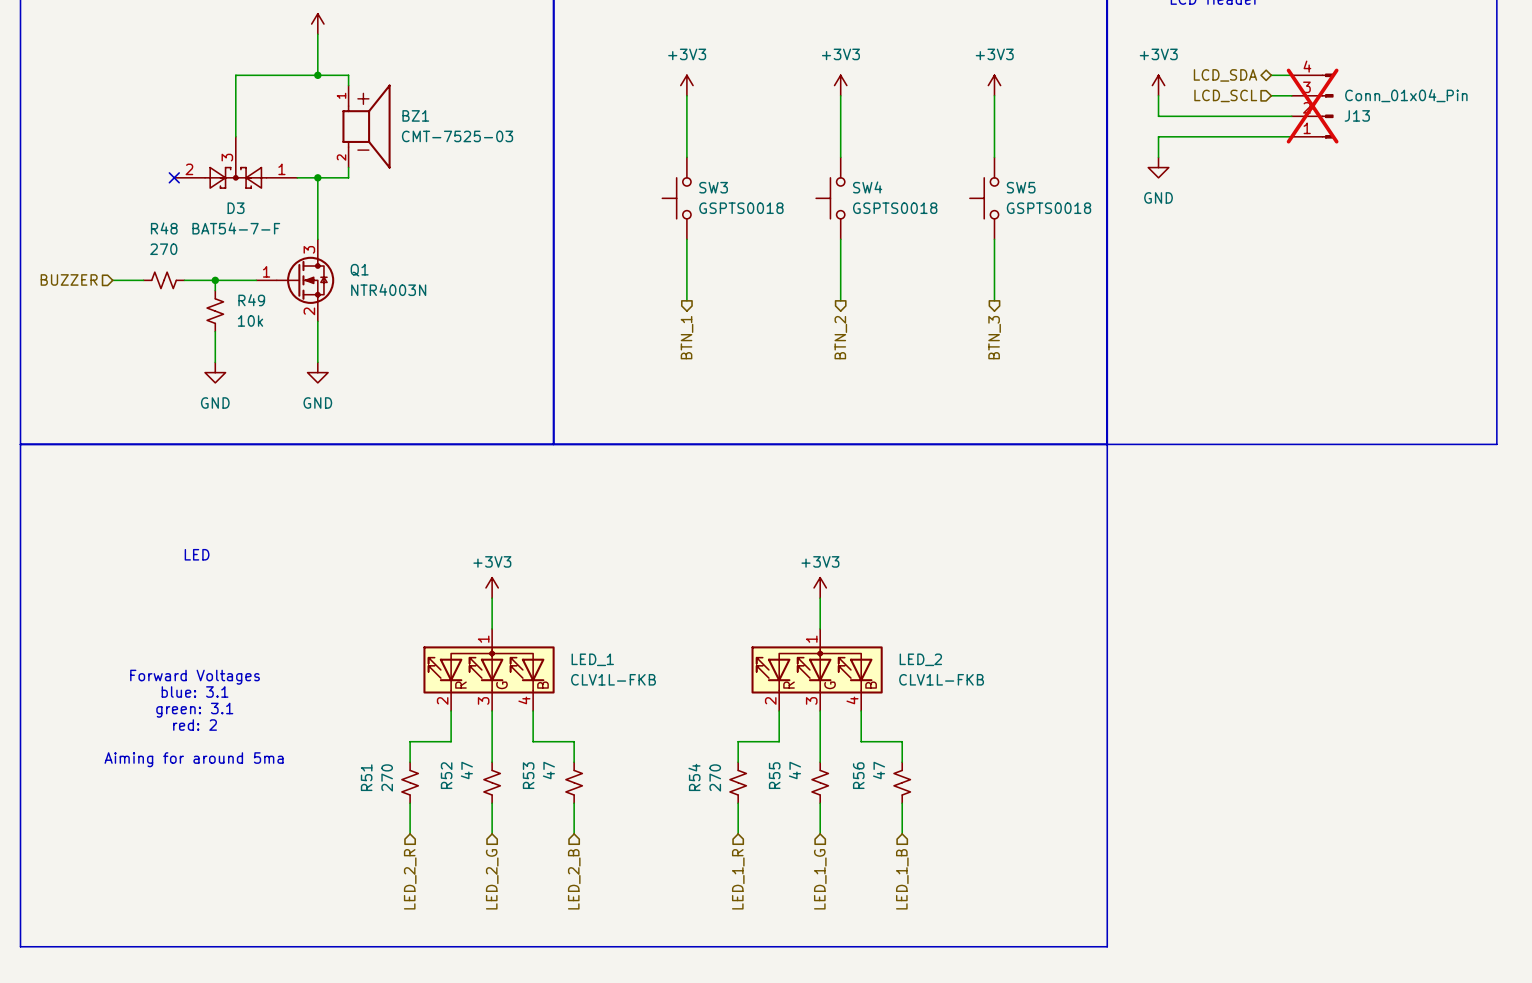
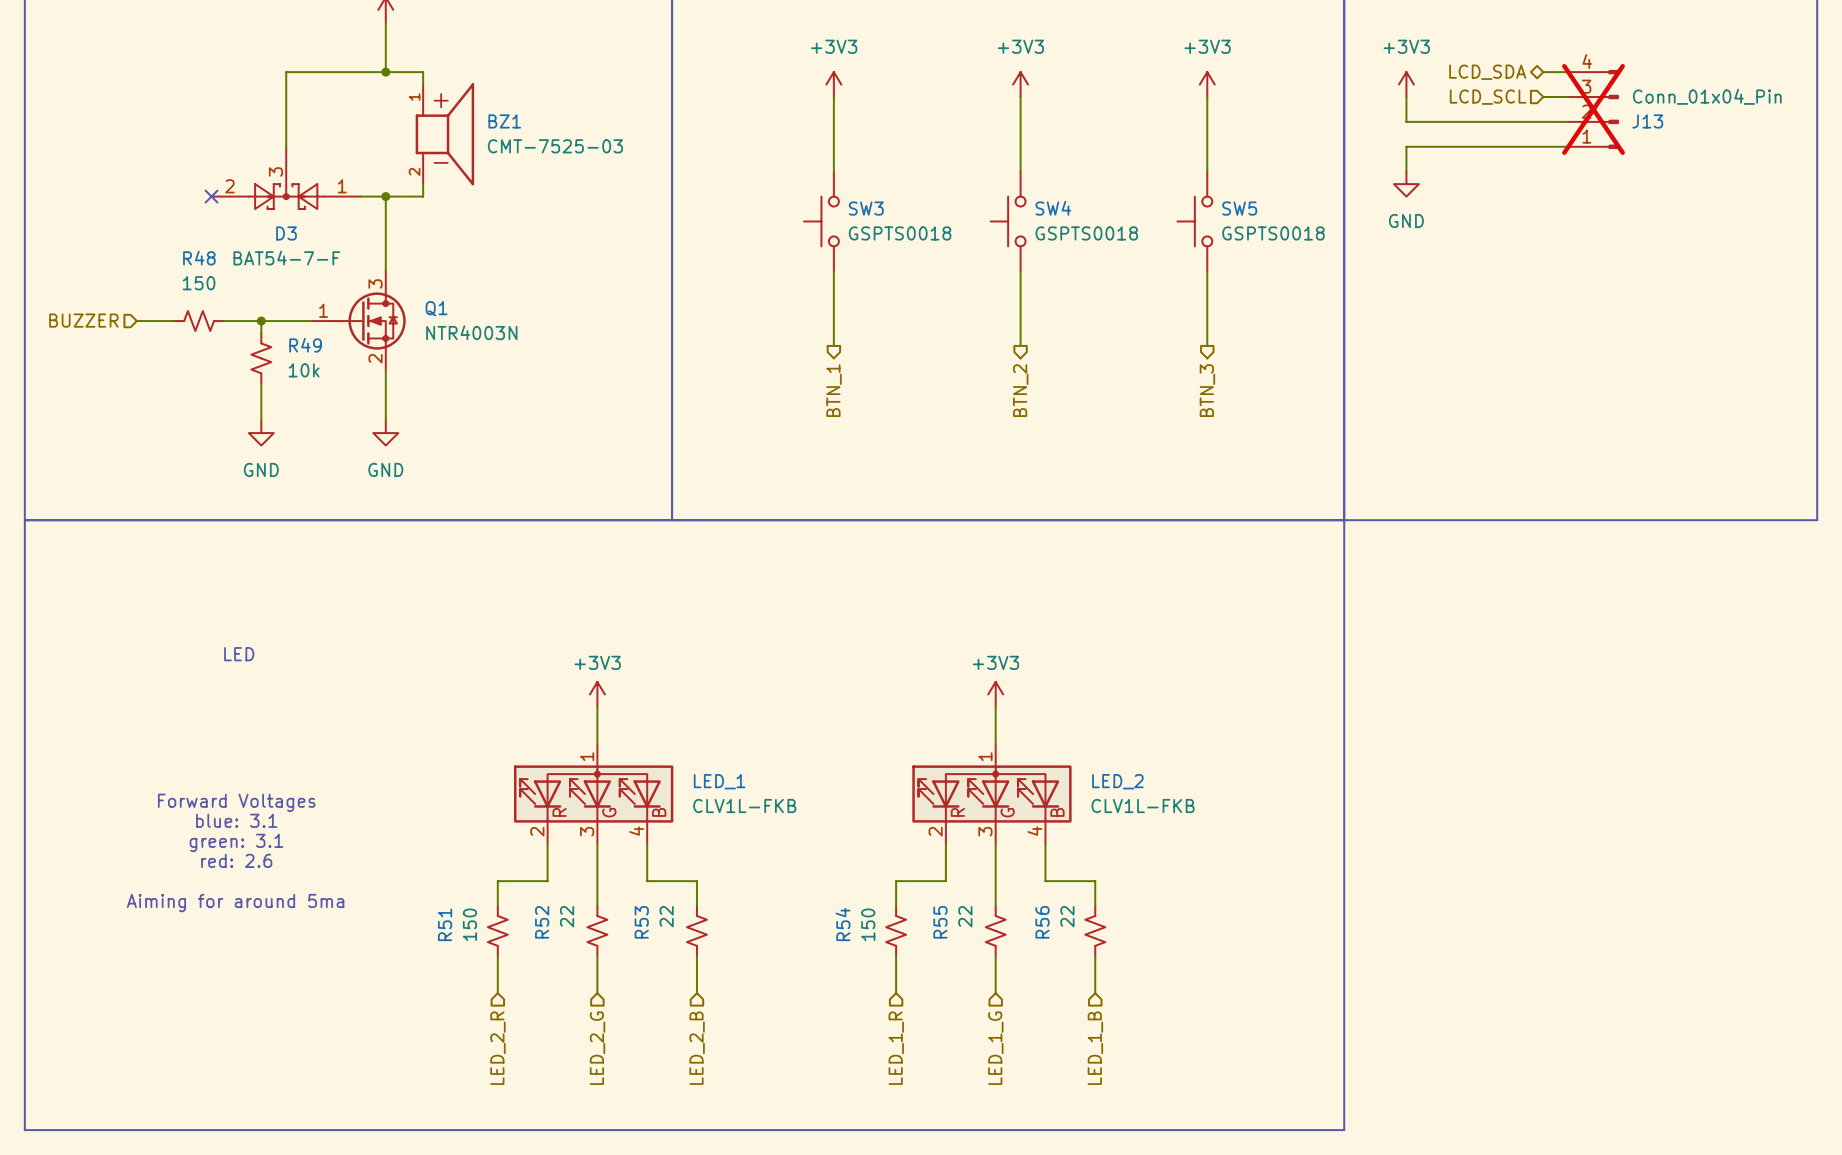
R48 value: 270 (163, 249) -> 150 (199, 283)
text: red: 2 (195, 725) -> red: 2.6 (236, 860)
R52 value: 47 (466, 770) -> 22 (567, 916)
R53 value: 47 (548, 770) -> 22 (666, 916)
R55 value: 47 (794, 770) -> 22 (965, 916)
R56 value: 47 (879, 770) -> 22 (1067, 916)
R51 value: 270 (387, 777) -> 150 (469, 924)
R54 value: 270 (715, 777) -> 150 (868, 924)

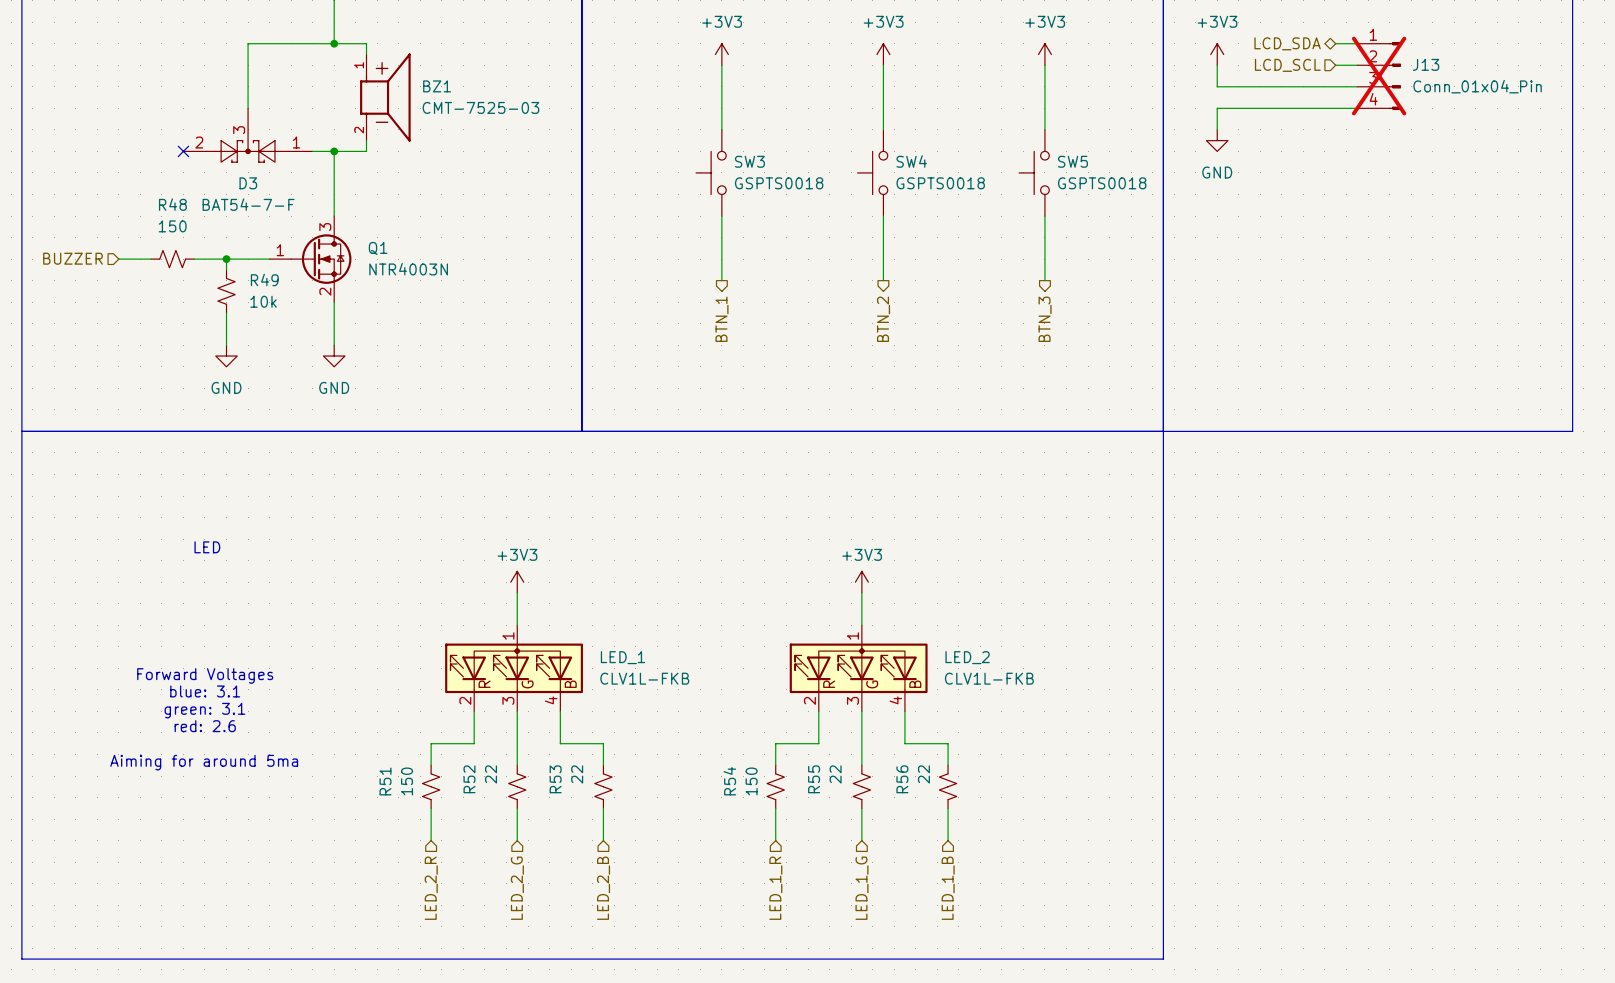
J13 flip: as is (1611, 109) -> up-down (1394, 76)

